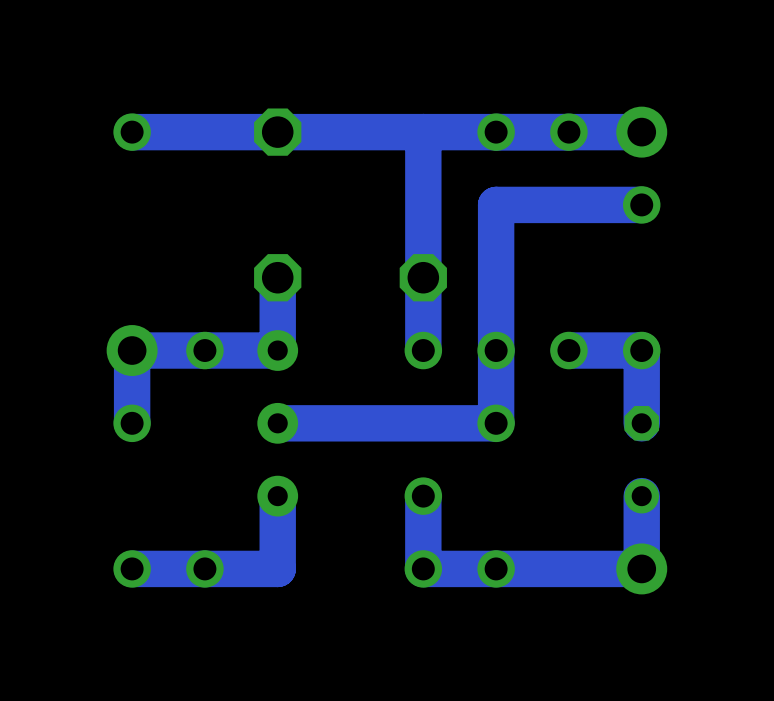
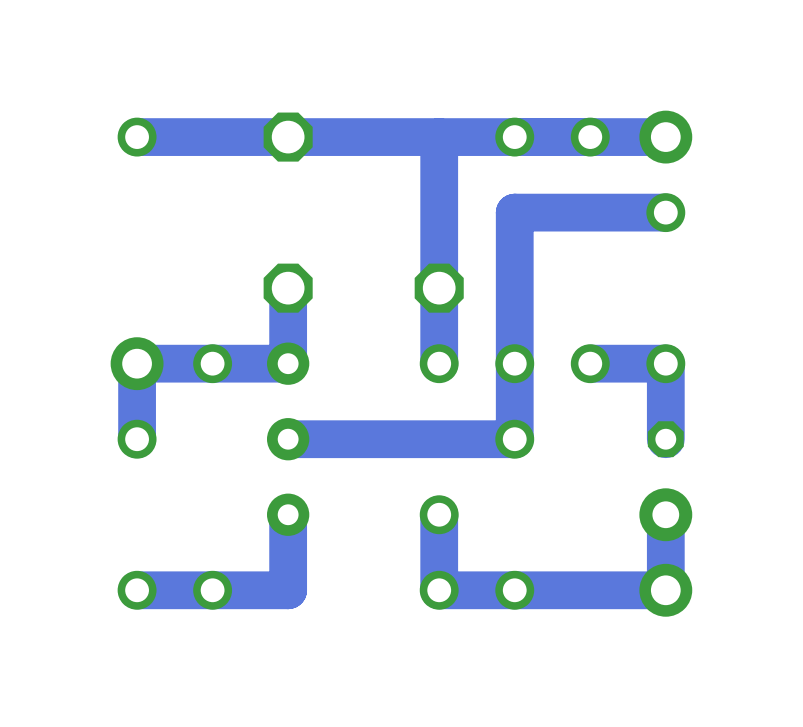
part footprint: [624, 406, 660, 514] -> [639, 421, 693, 542]

